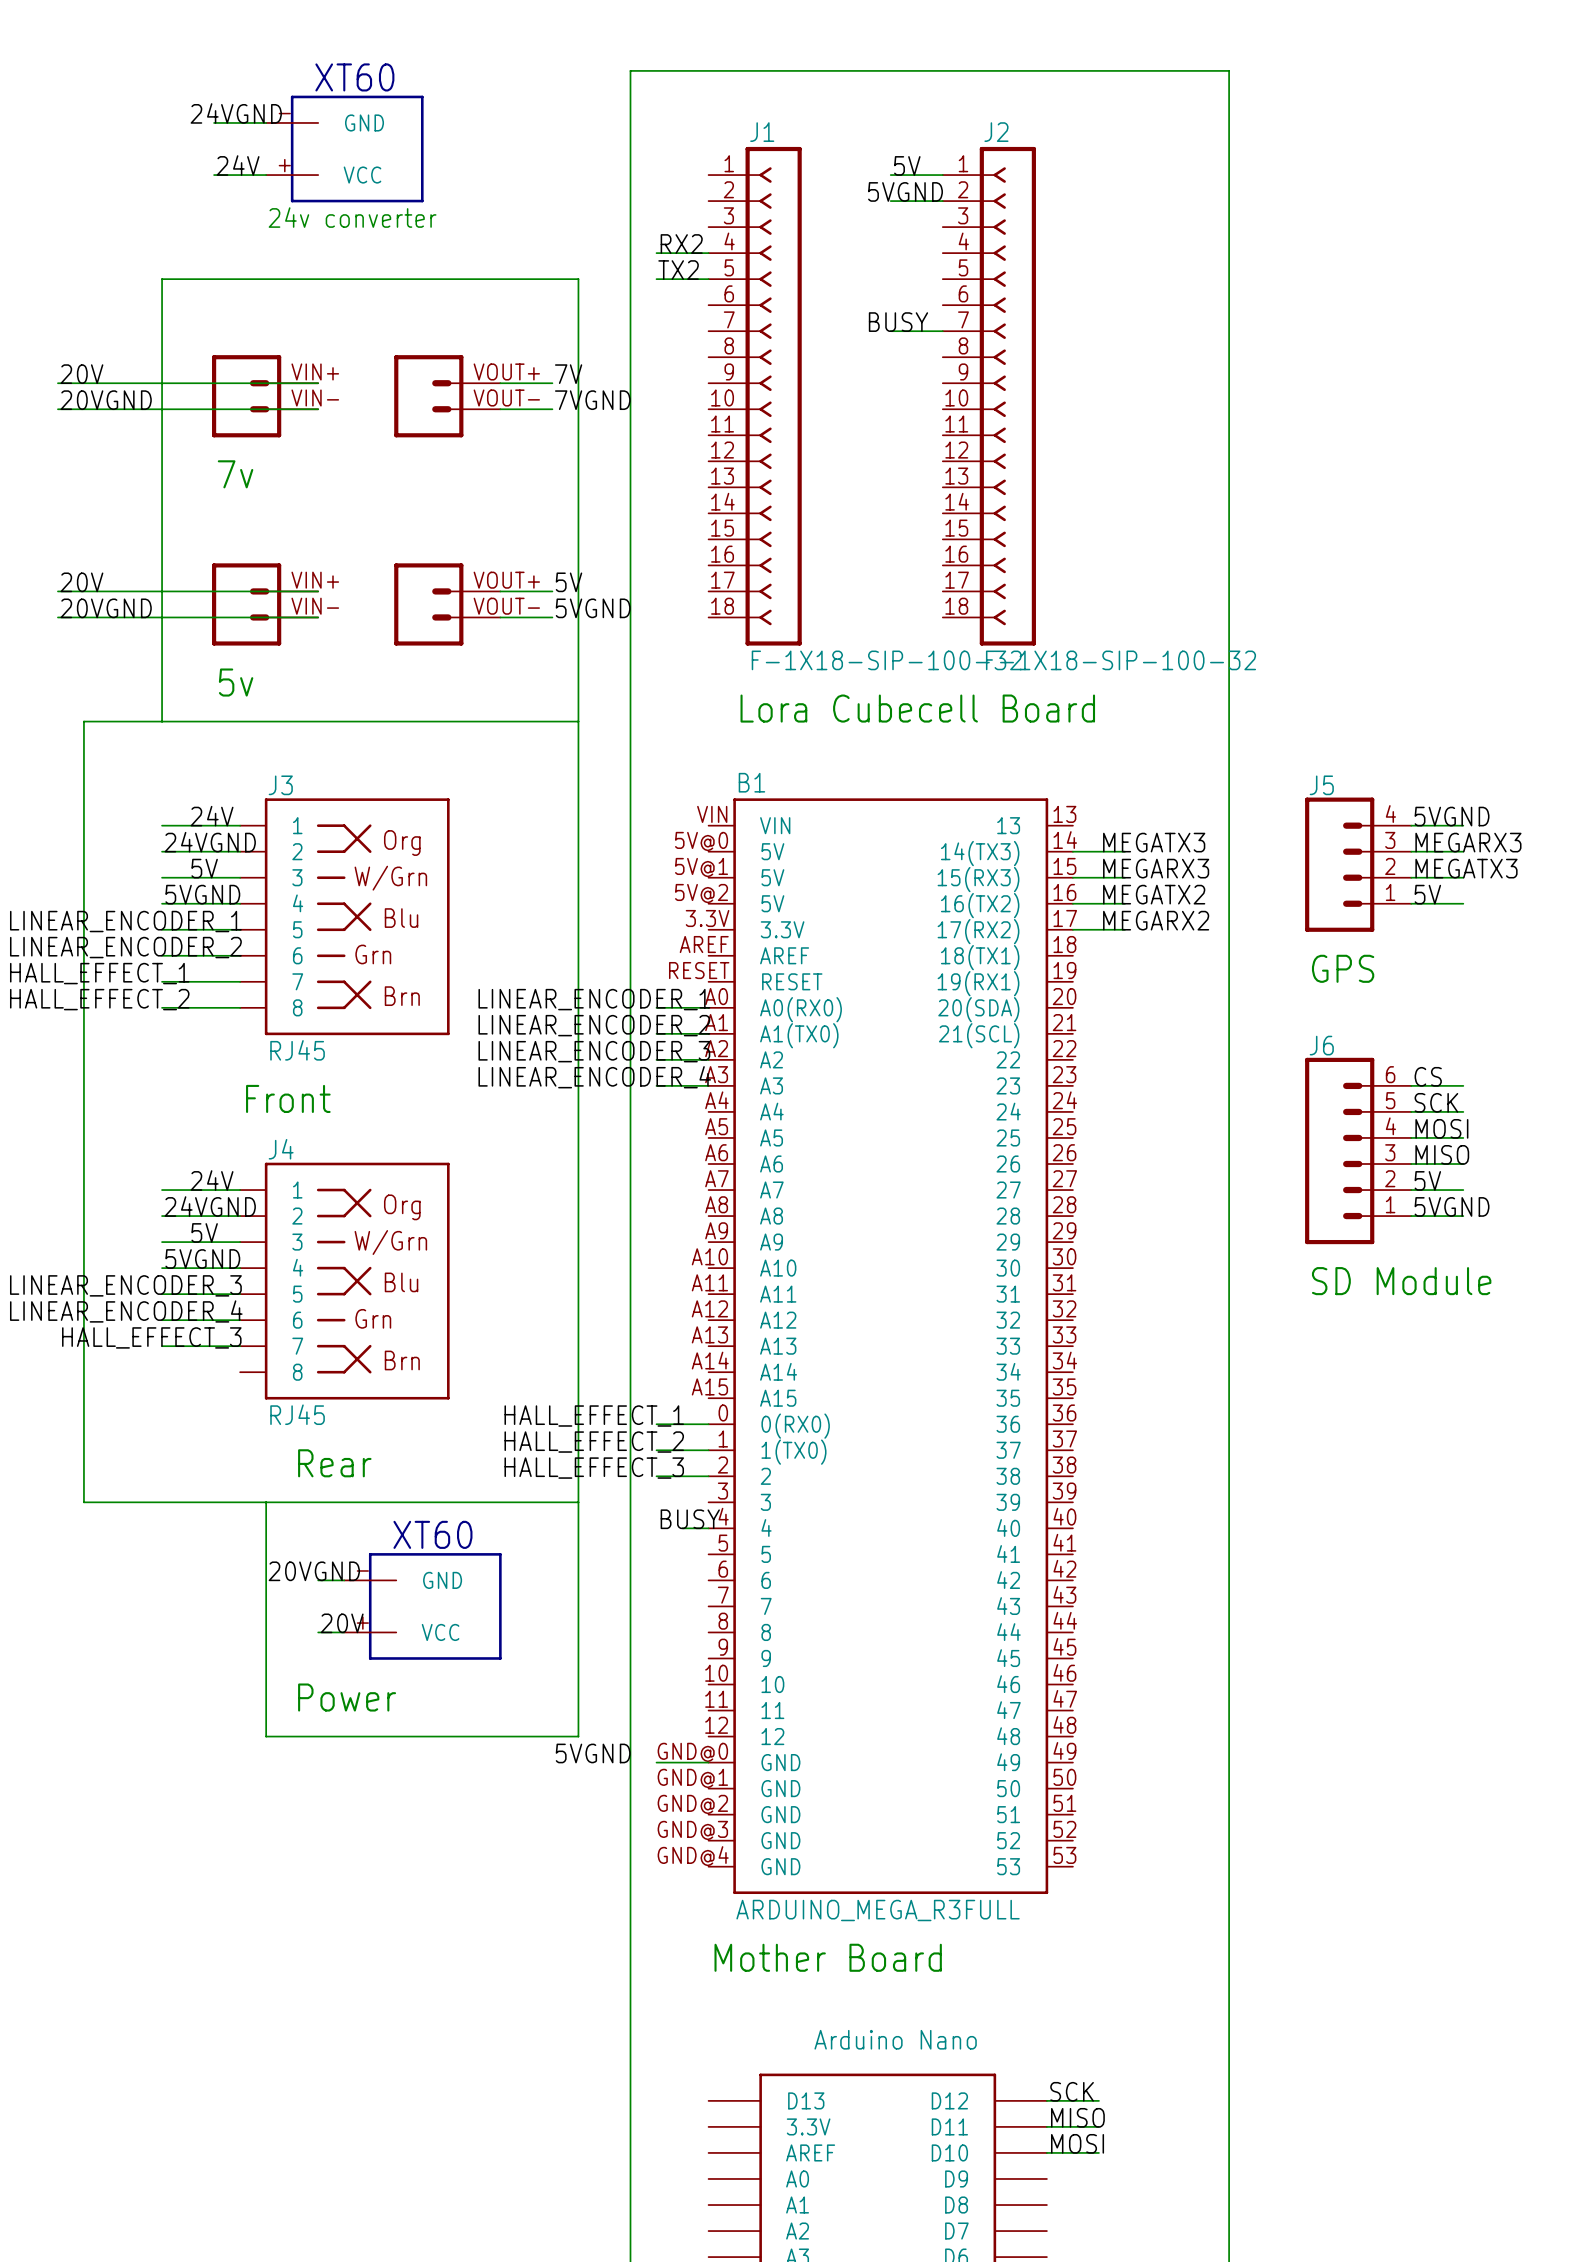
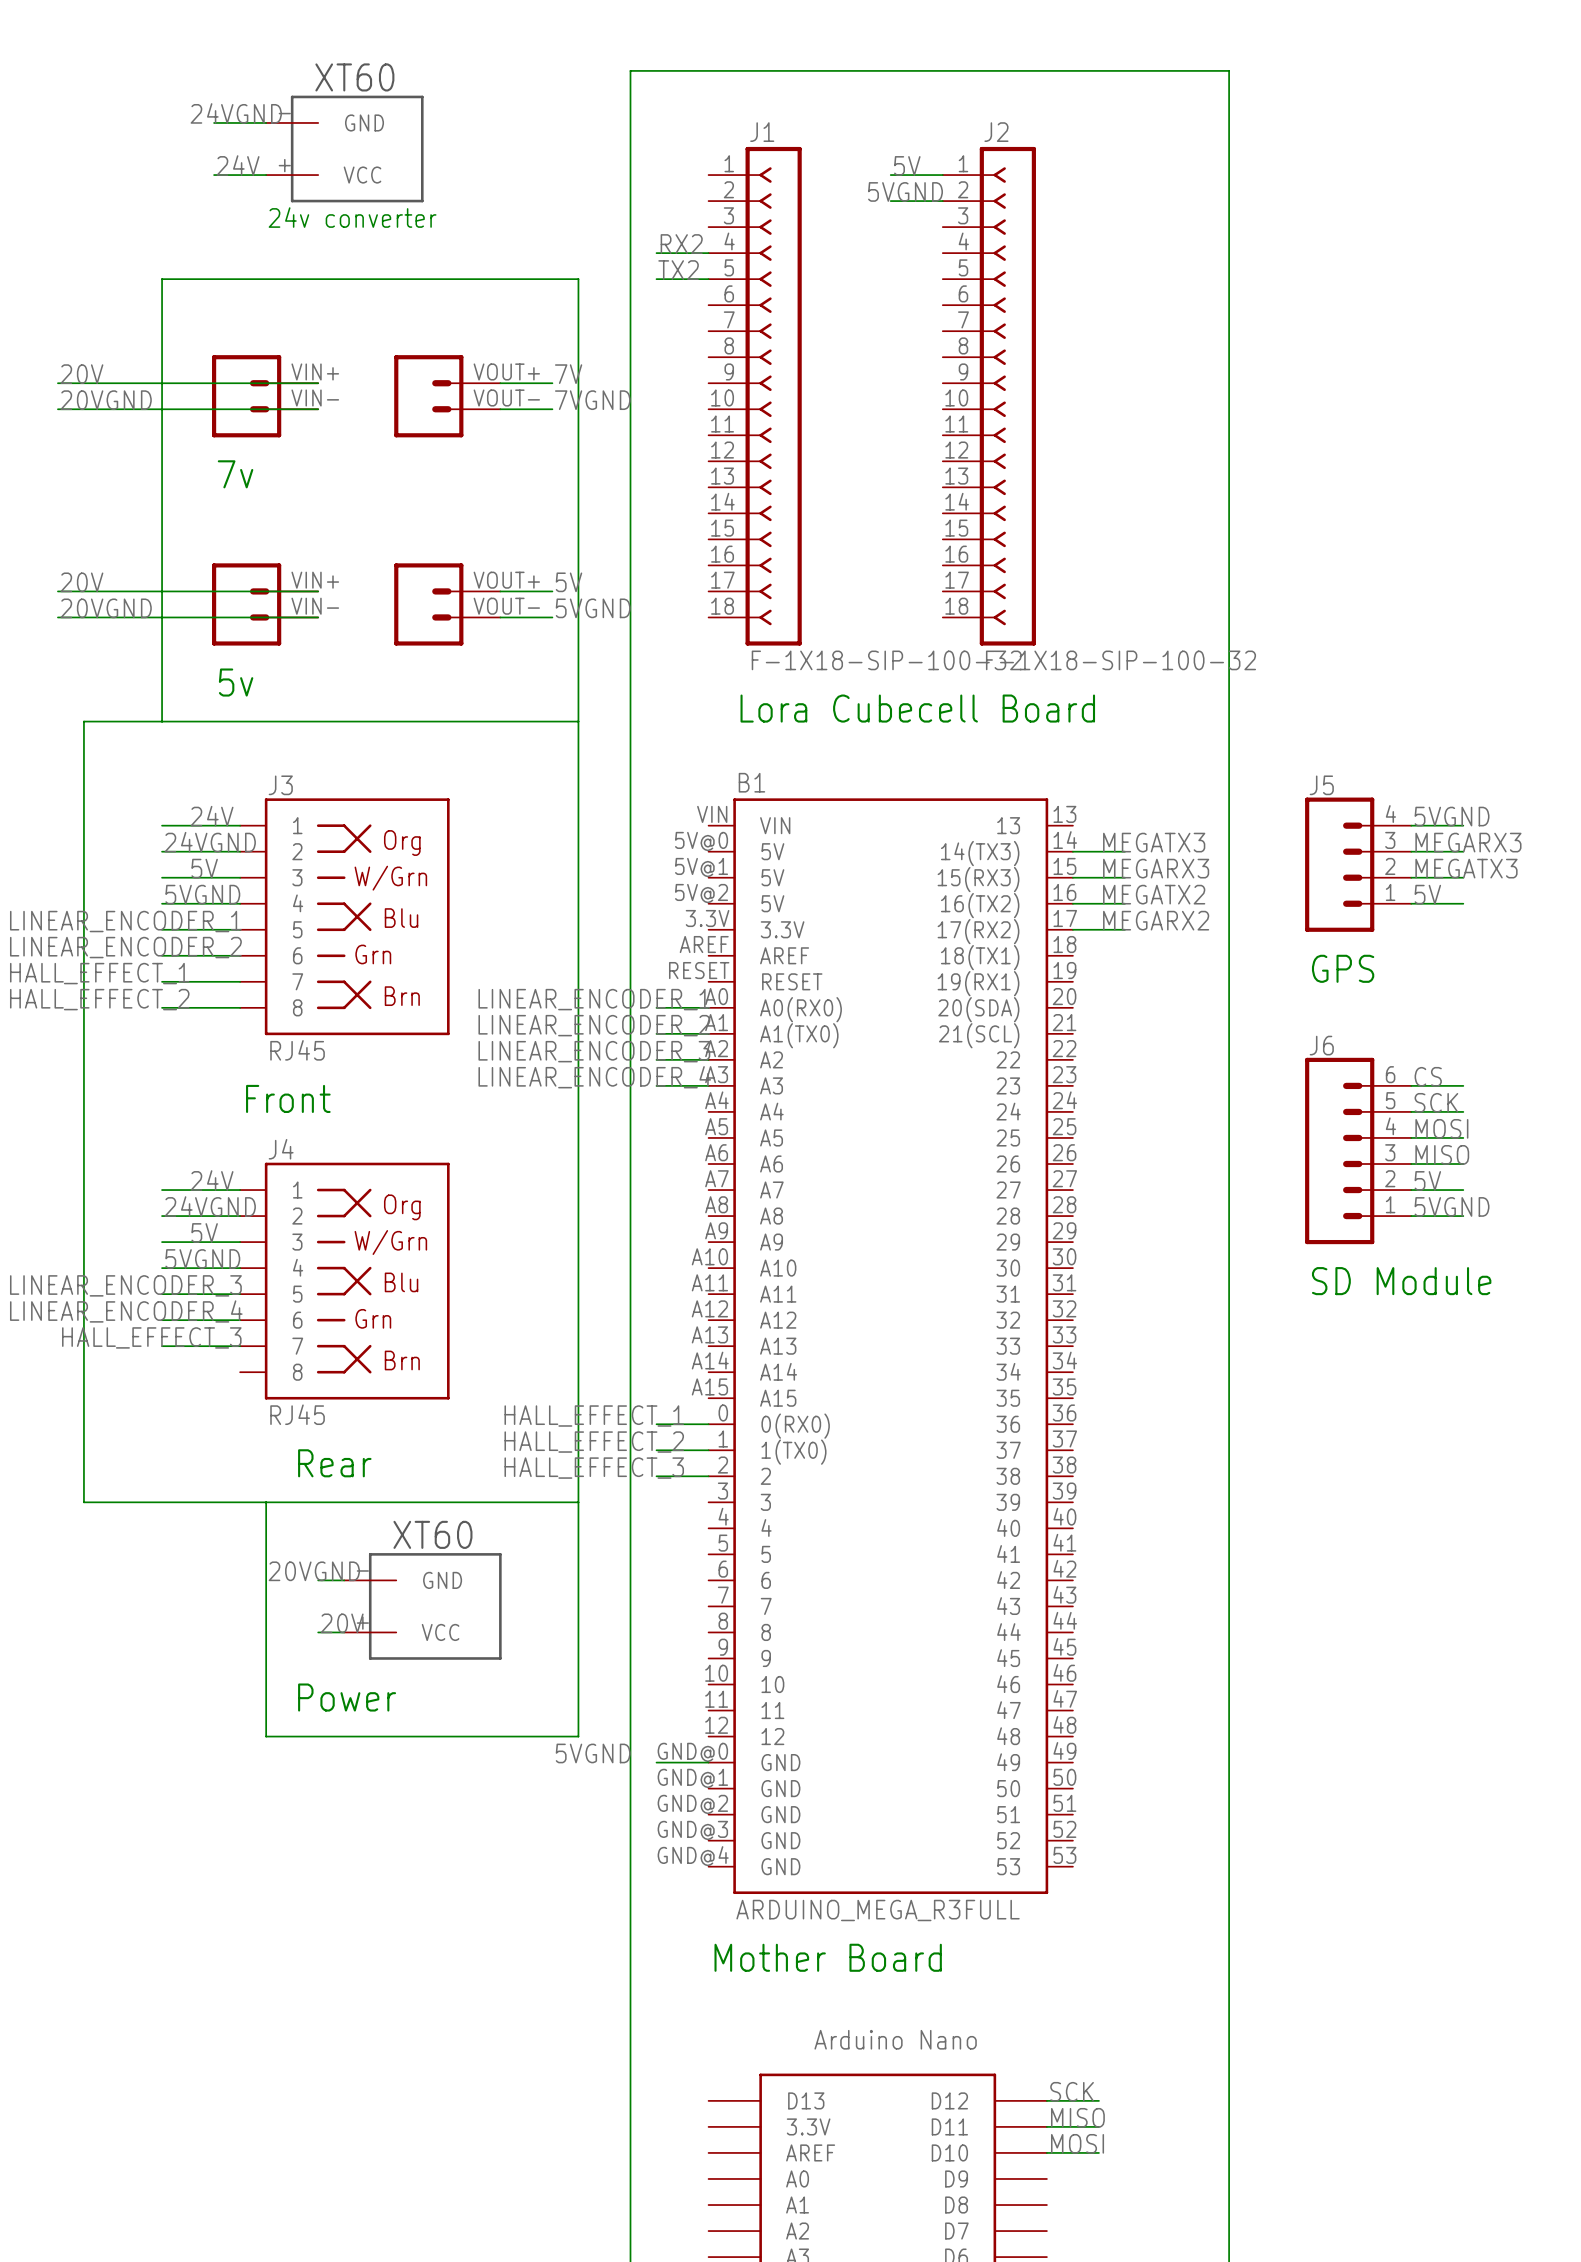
label: BUSY (898, 322) -> none
wire: (890, 331) (942, 331) -> none
label: BUSY (690, 1519) -> none
wire: (682, 1528) (708, 1528) -> none

